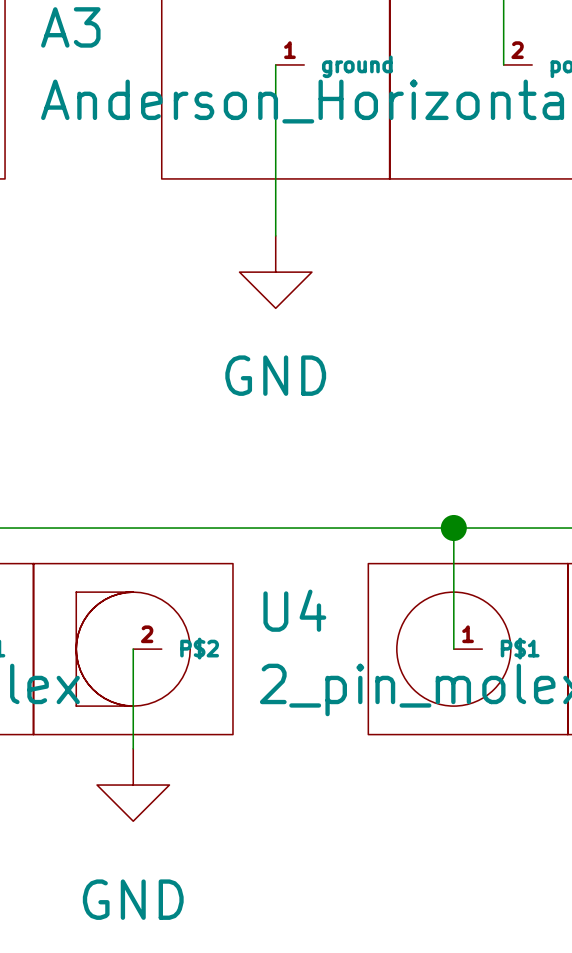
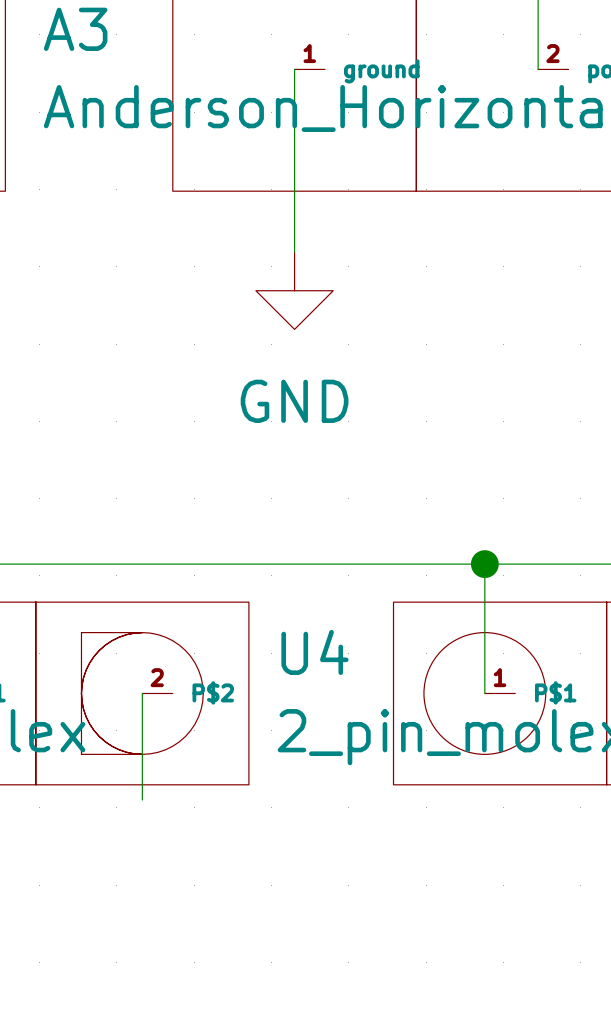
power symbol: GND (133, 785) -> none

